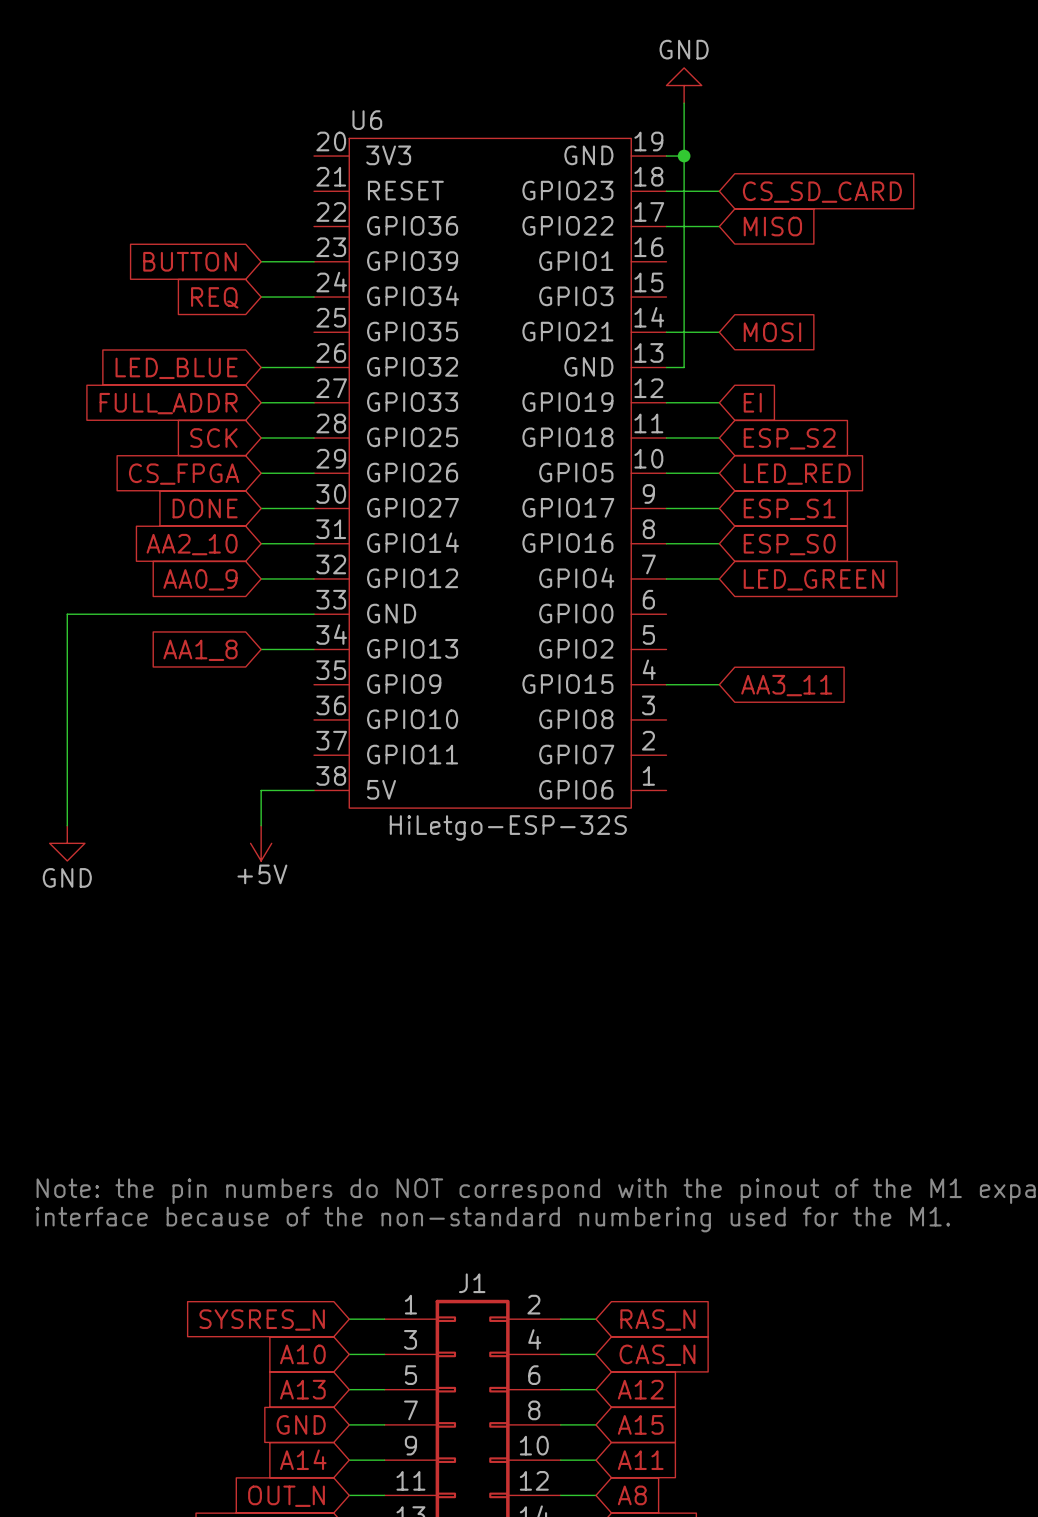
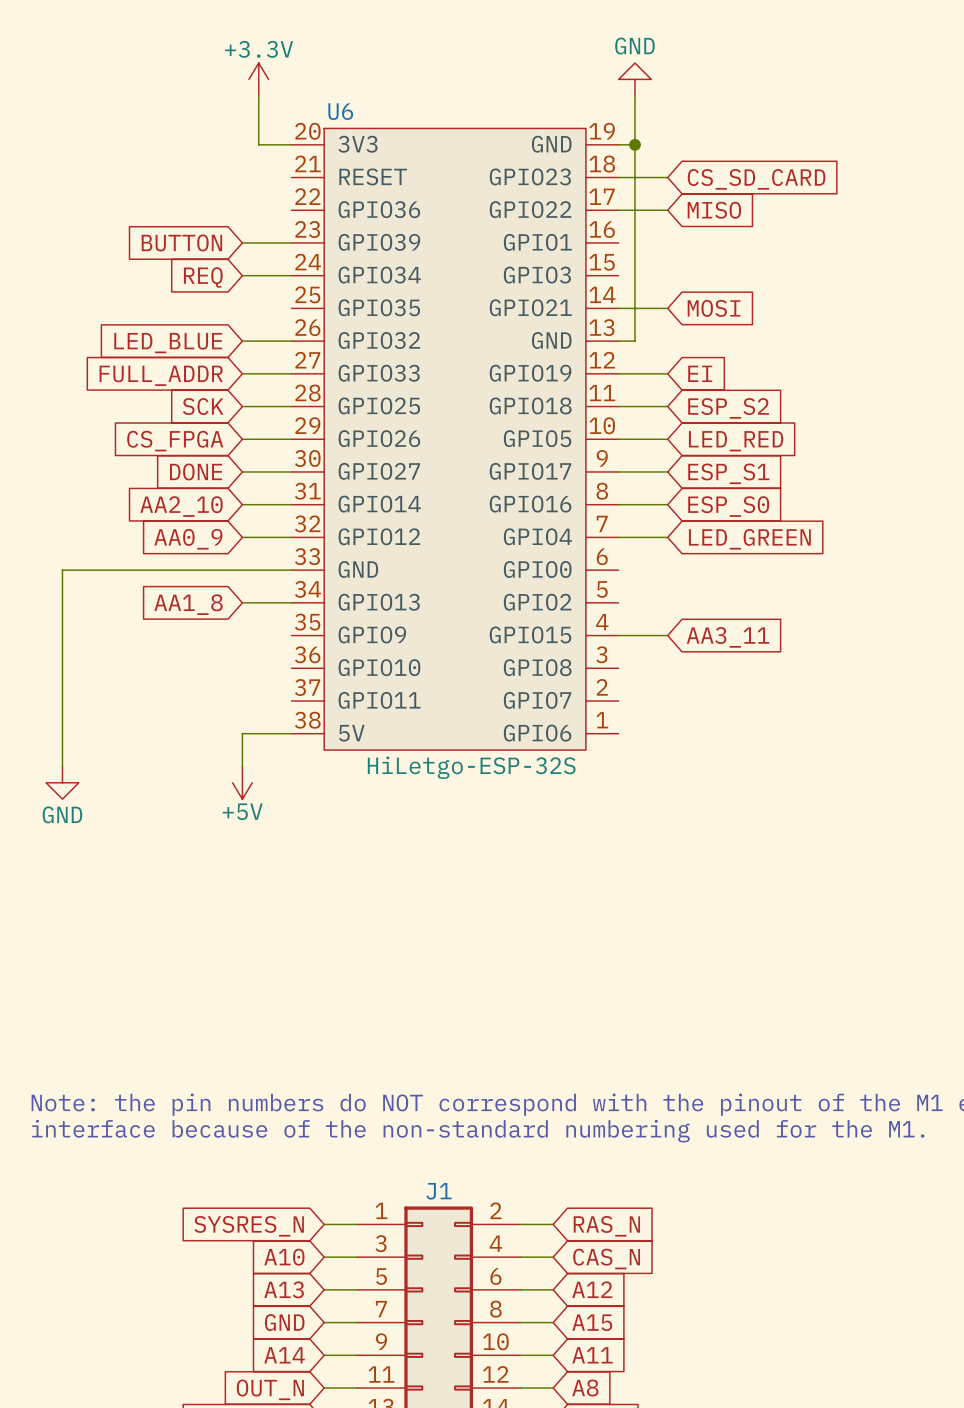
power symbol: none -> +3.3V (258, 79)
wire: none -> (258, 95) (258, 144) (291, 144)

